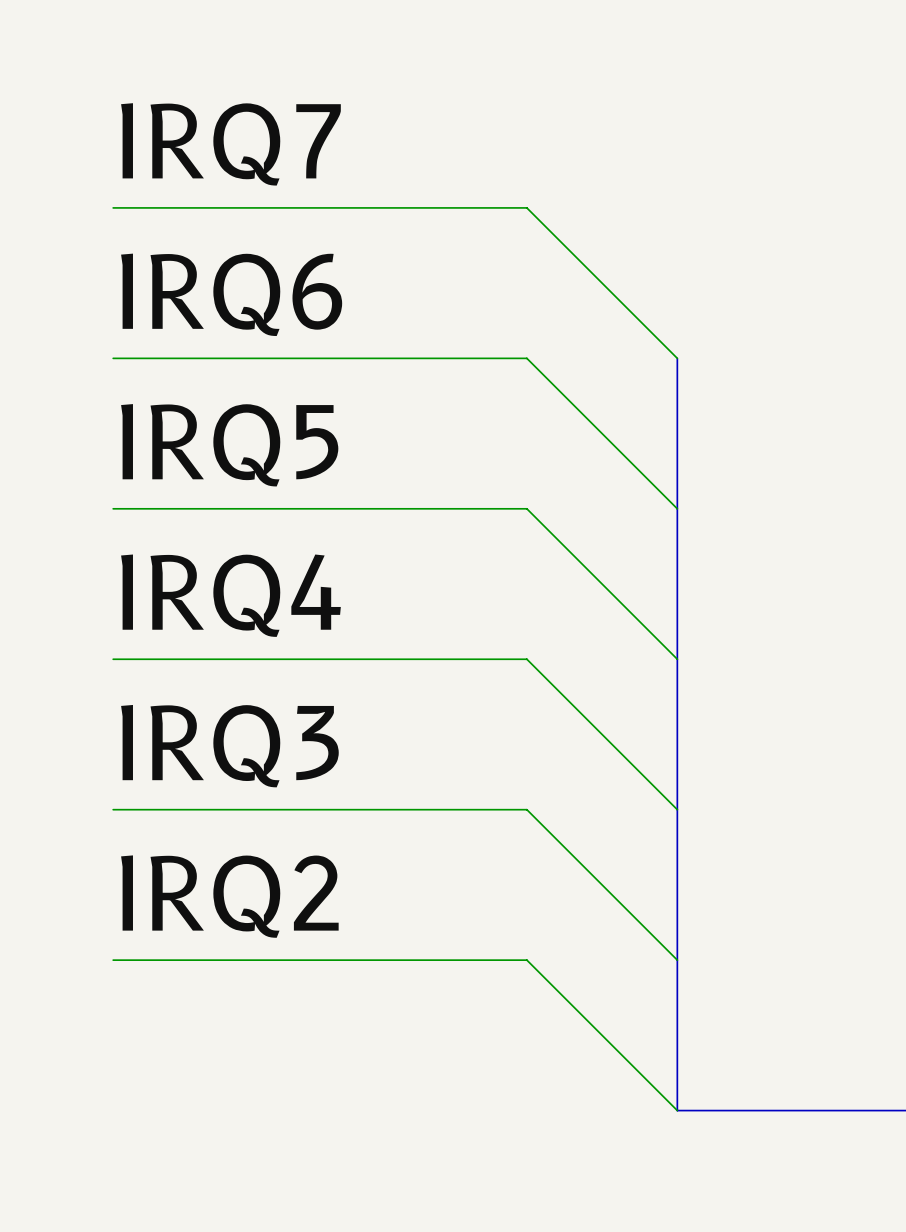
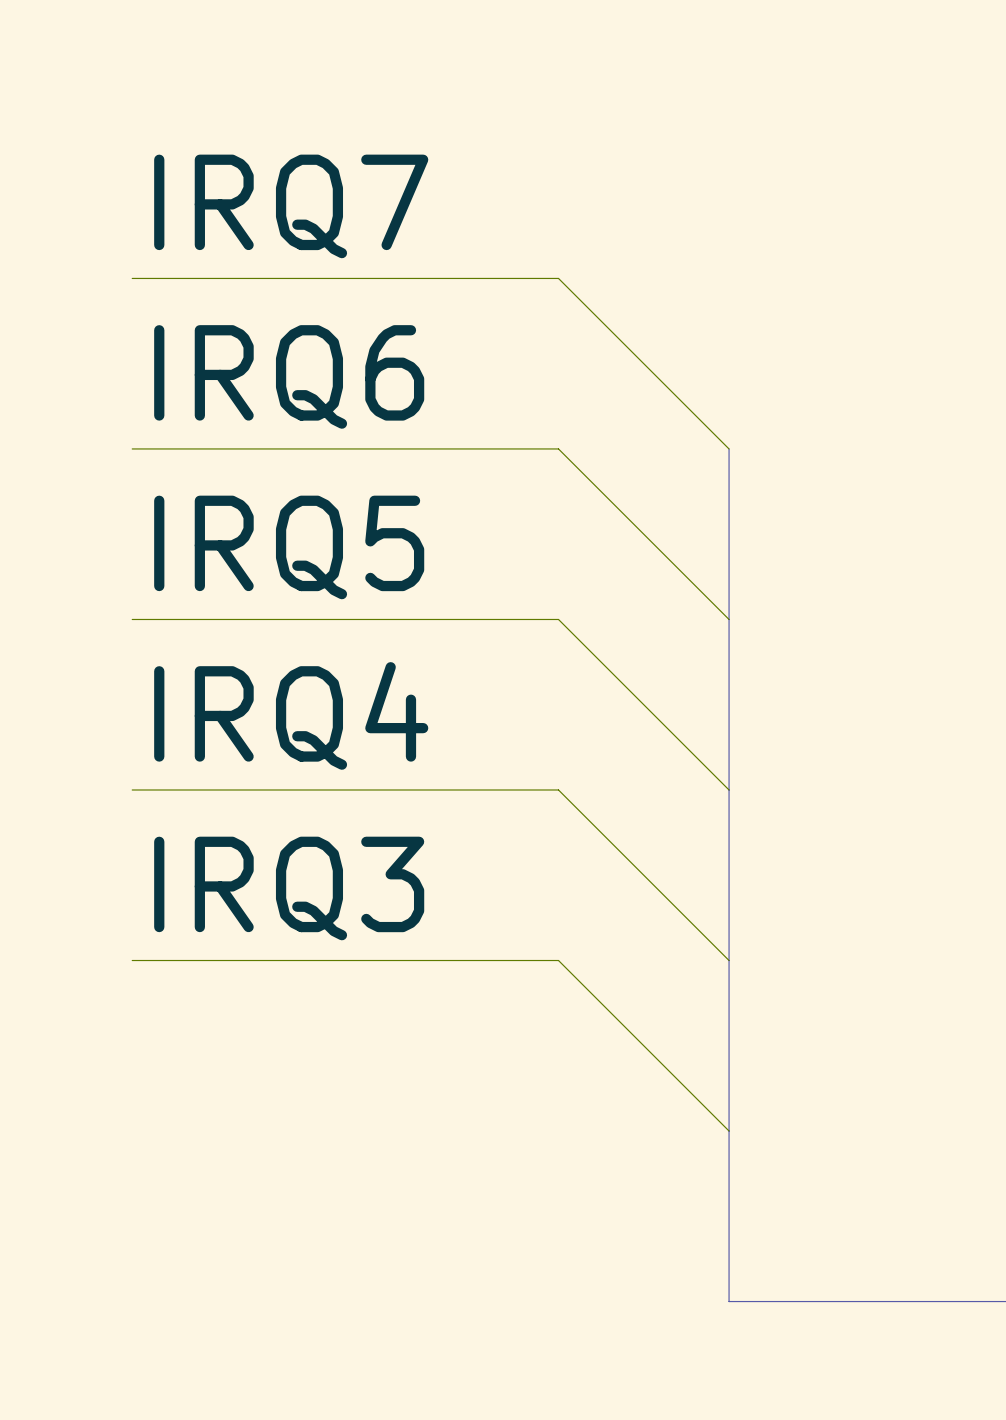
label position: IRQ7 (230, 144) -> IRQ7 (291, 206)
wire: (113, 207) (150, 207) -> none
label position: IRQ6 (231, 294) -> IRQ6 (289, 376)
wire: (113, 358) (150, 358) -> none
label position: IRQ5 (229, 445) -> IRQ5 (289, 547)
wire: (113, 508) (150, 508) -> none
label position: IRQ4 (230, 595) -> IRQ4 (291, 715)
wire: (113, 659) (150, 659) -> none
label position: IRQ3 (229, 746) -> IRQ3 (289, 888)
wire: (113, 809) (150, 809) -> none
label: IRQ2 (229, 896) -> none
wire: (113, 960) (526, 960) (677, 1110) -> none

